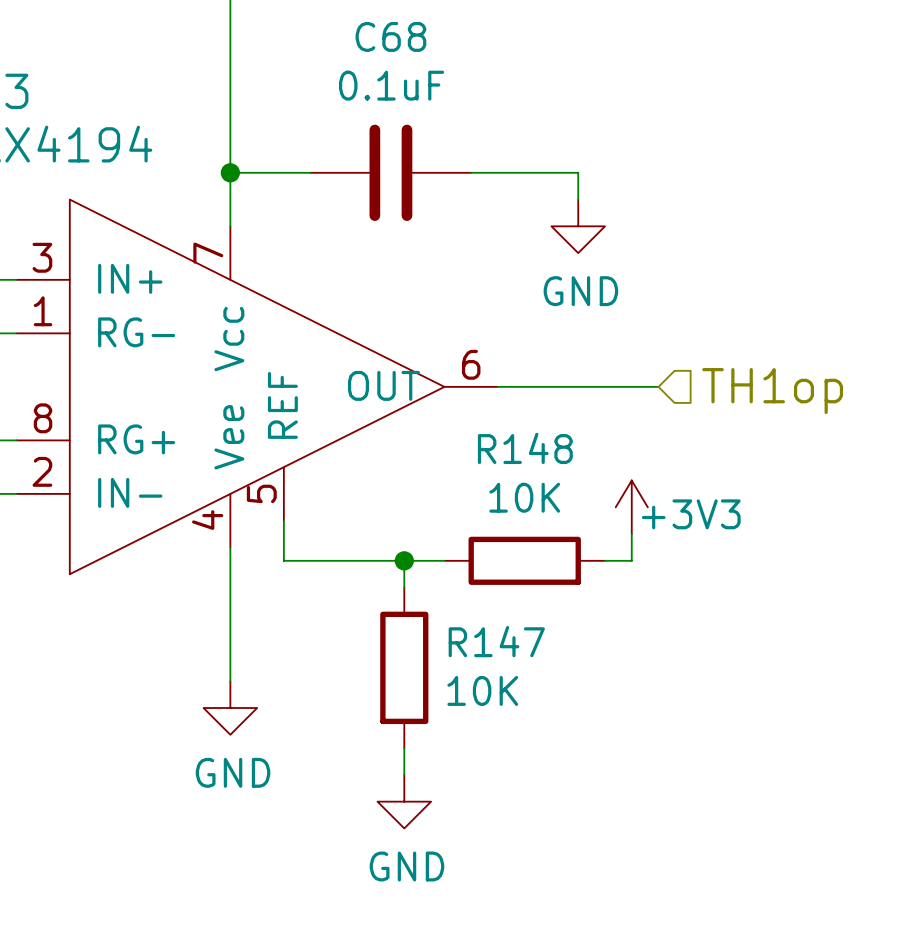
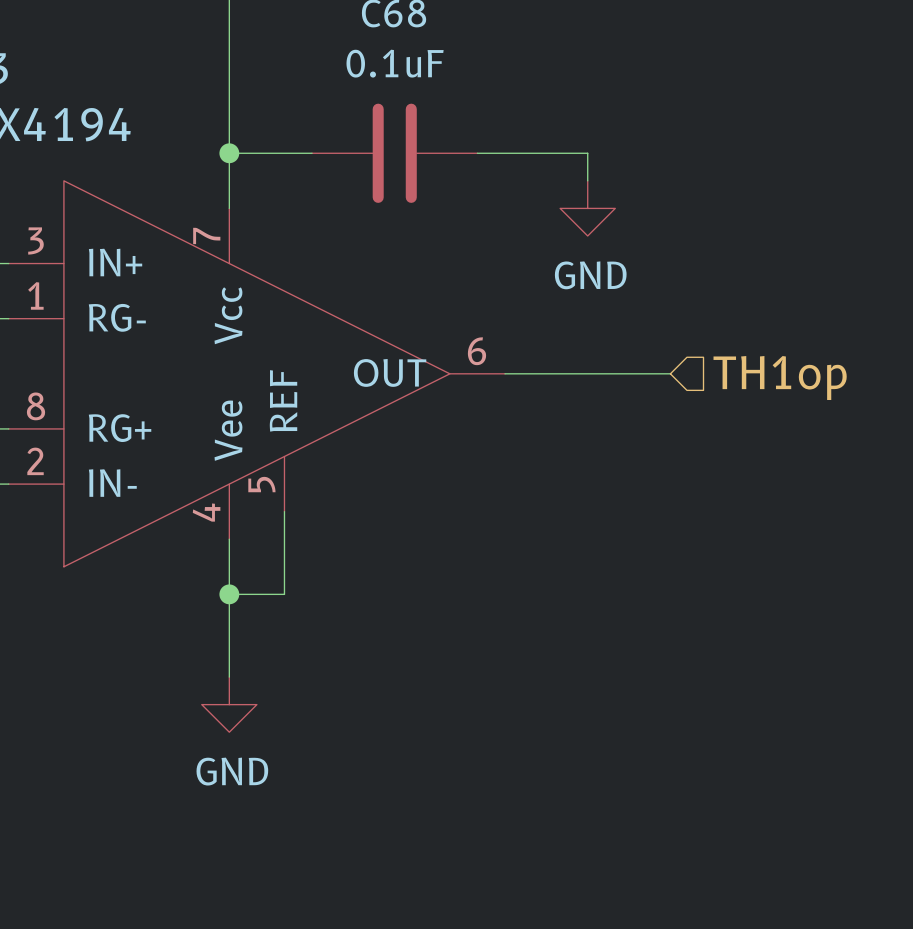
power symbol: +3V3 (631, 507) -> none
wire: (631, 534) (631, 560) (605, 560) -> none
wire: (283, 560) (444, 560) -> (284, 553) (284, 594) (229, 594)
wire: (404, 560) (404, 587) -> none
junction: (404, 560) -> none
R148: 10K (524, 560) -> none
junction: none -> (229, 594)
R147: 10K (404, 667) -> none
wire: (404, 748) (404, 774) -> none
power symbol: GND (404, 801) -> none

